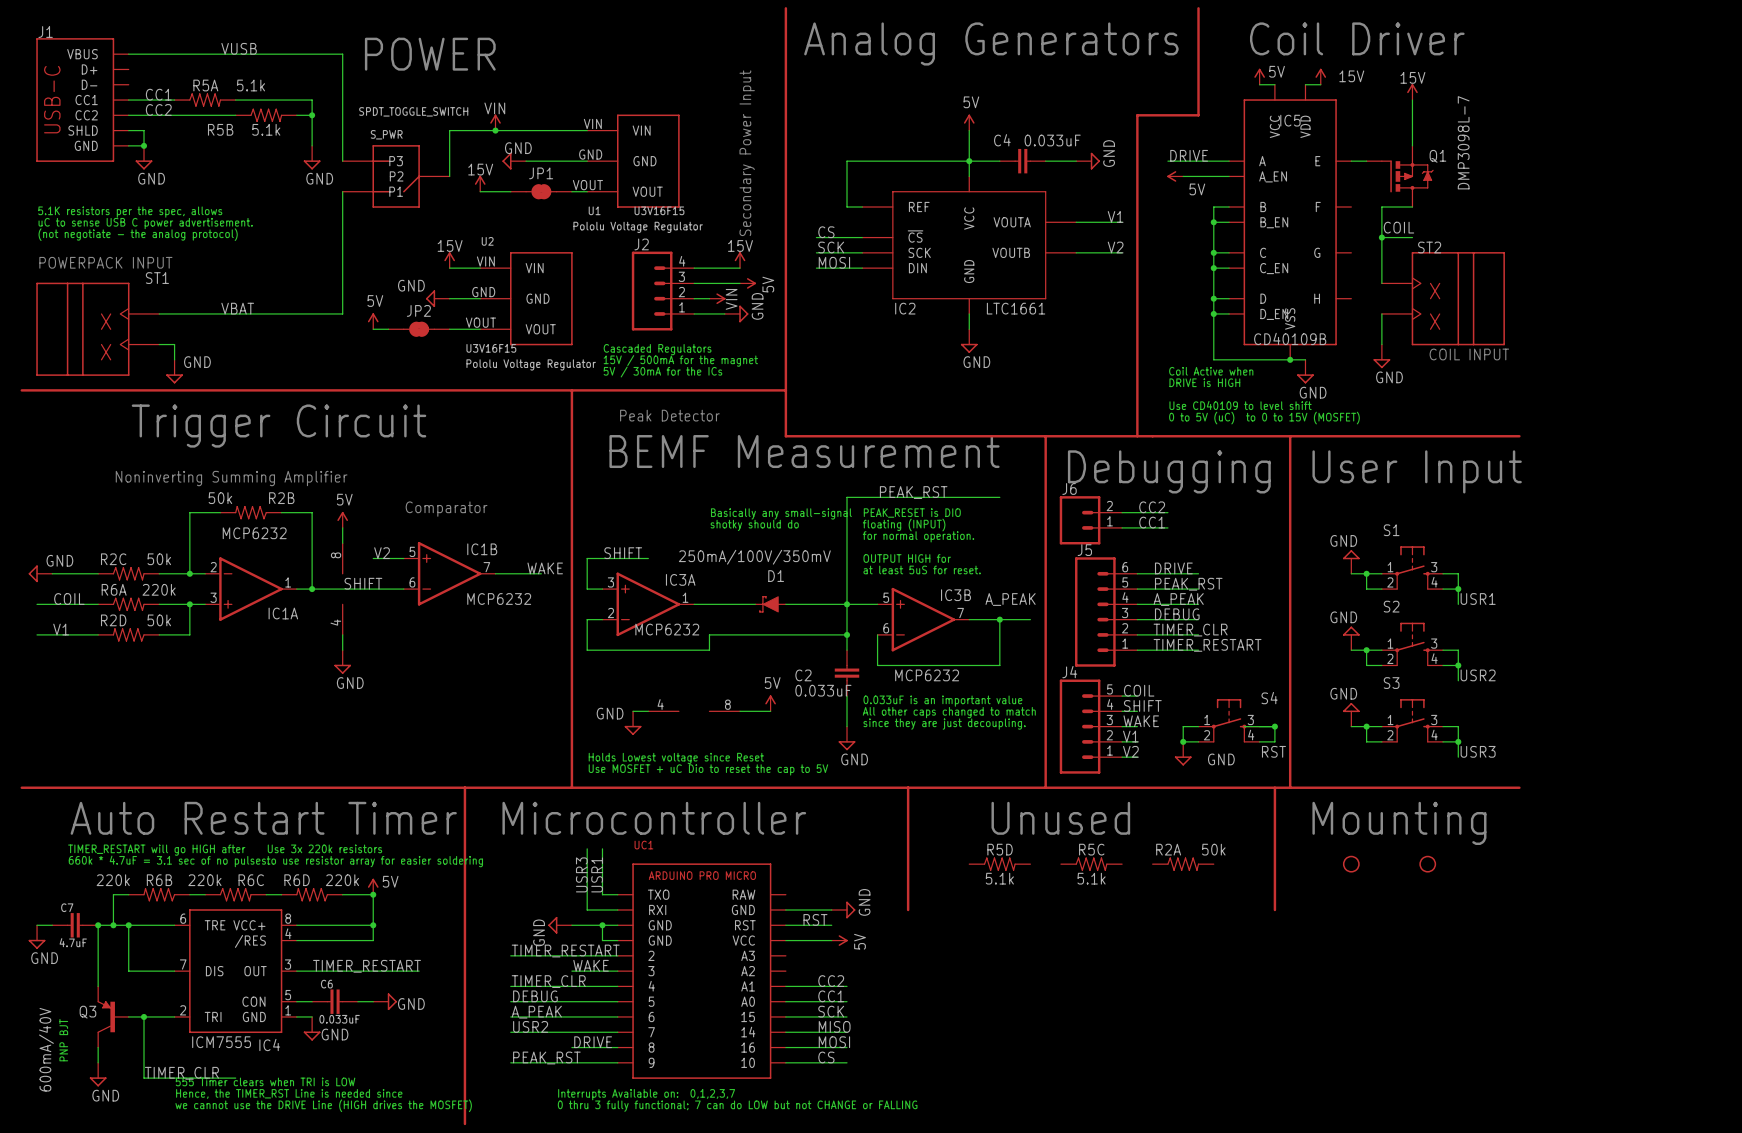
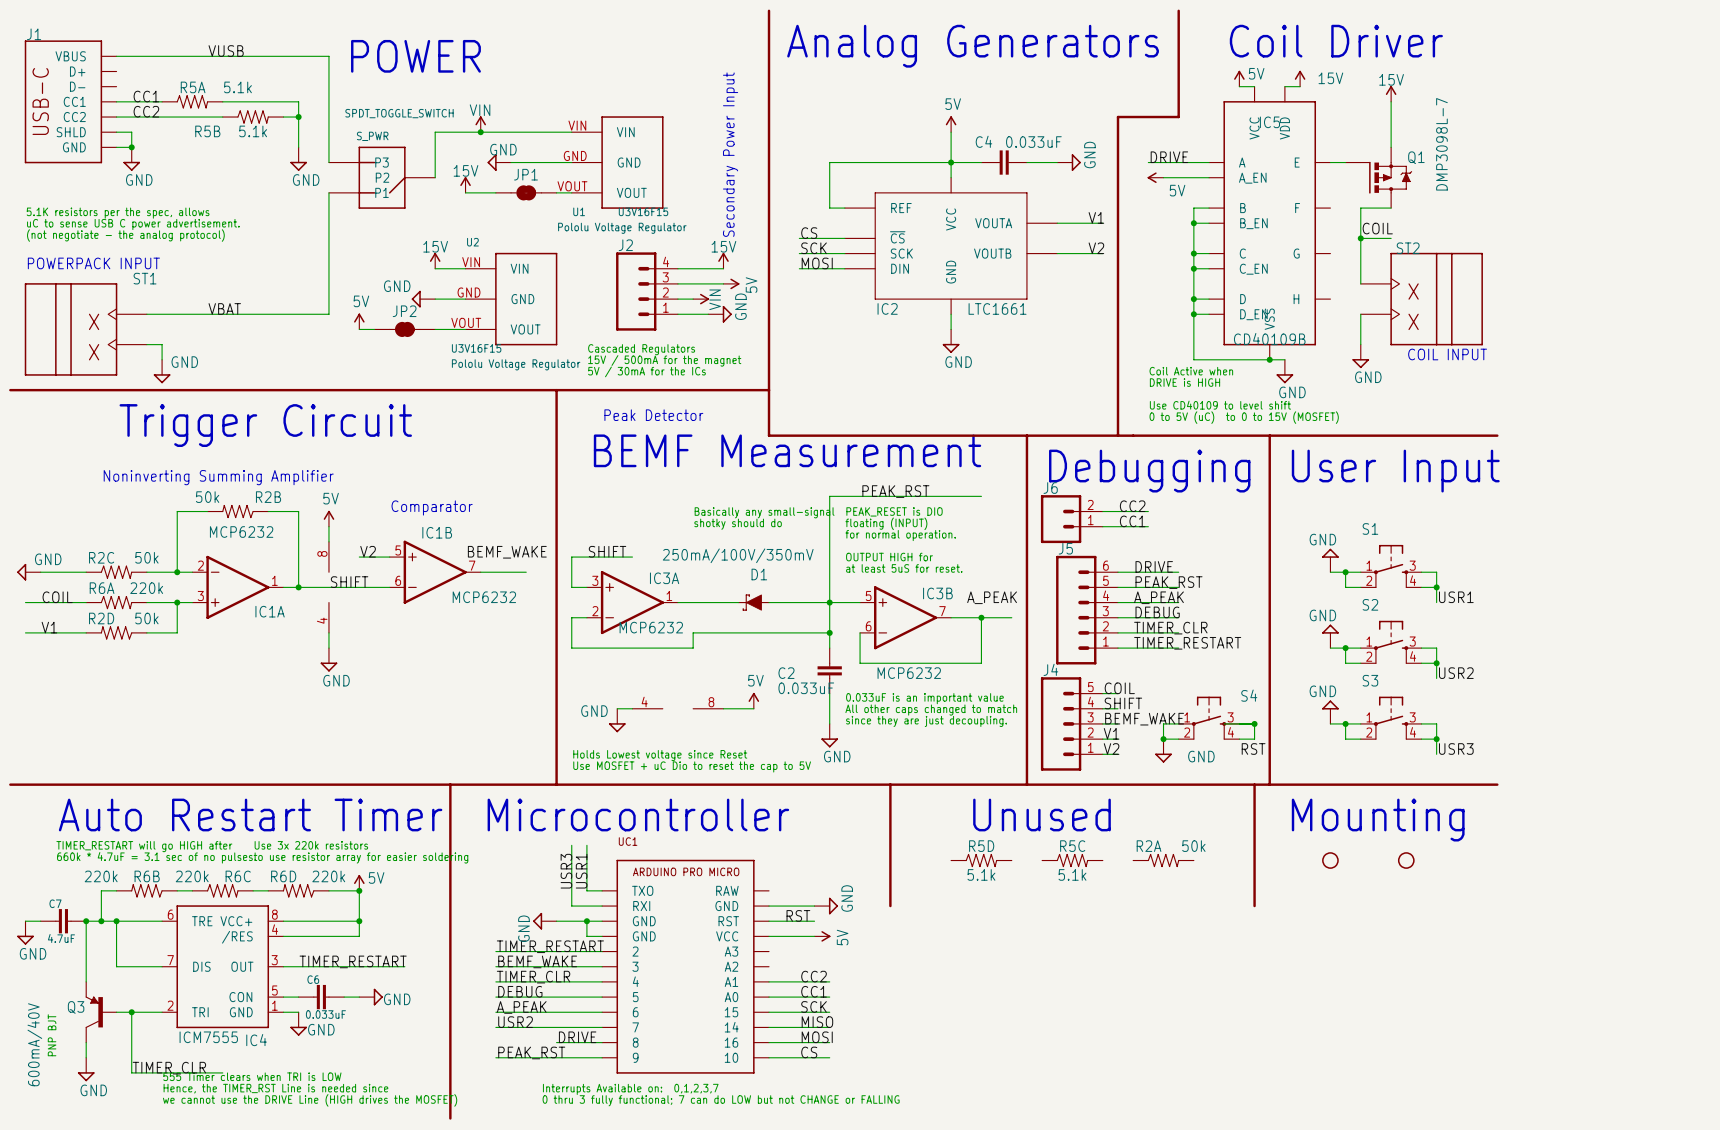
IC1B name position: IC1B (482, 549) -> IC1B (437, 532)
label: WAKE (545, 568) -> BEMF_WAKE (507, 552)
label: WAKE (1141, 721) -> BEMF_WAKE (1144, 719)
label: WAKE (591, 965) -> BEMF_WAKE (537, 961)
wire: none -> (495, 966) (556, 966)

